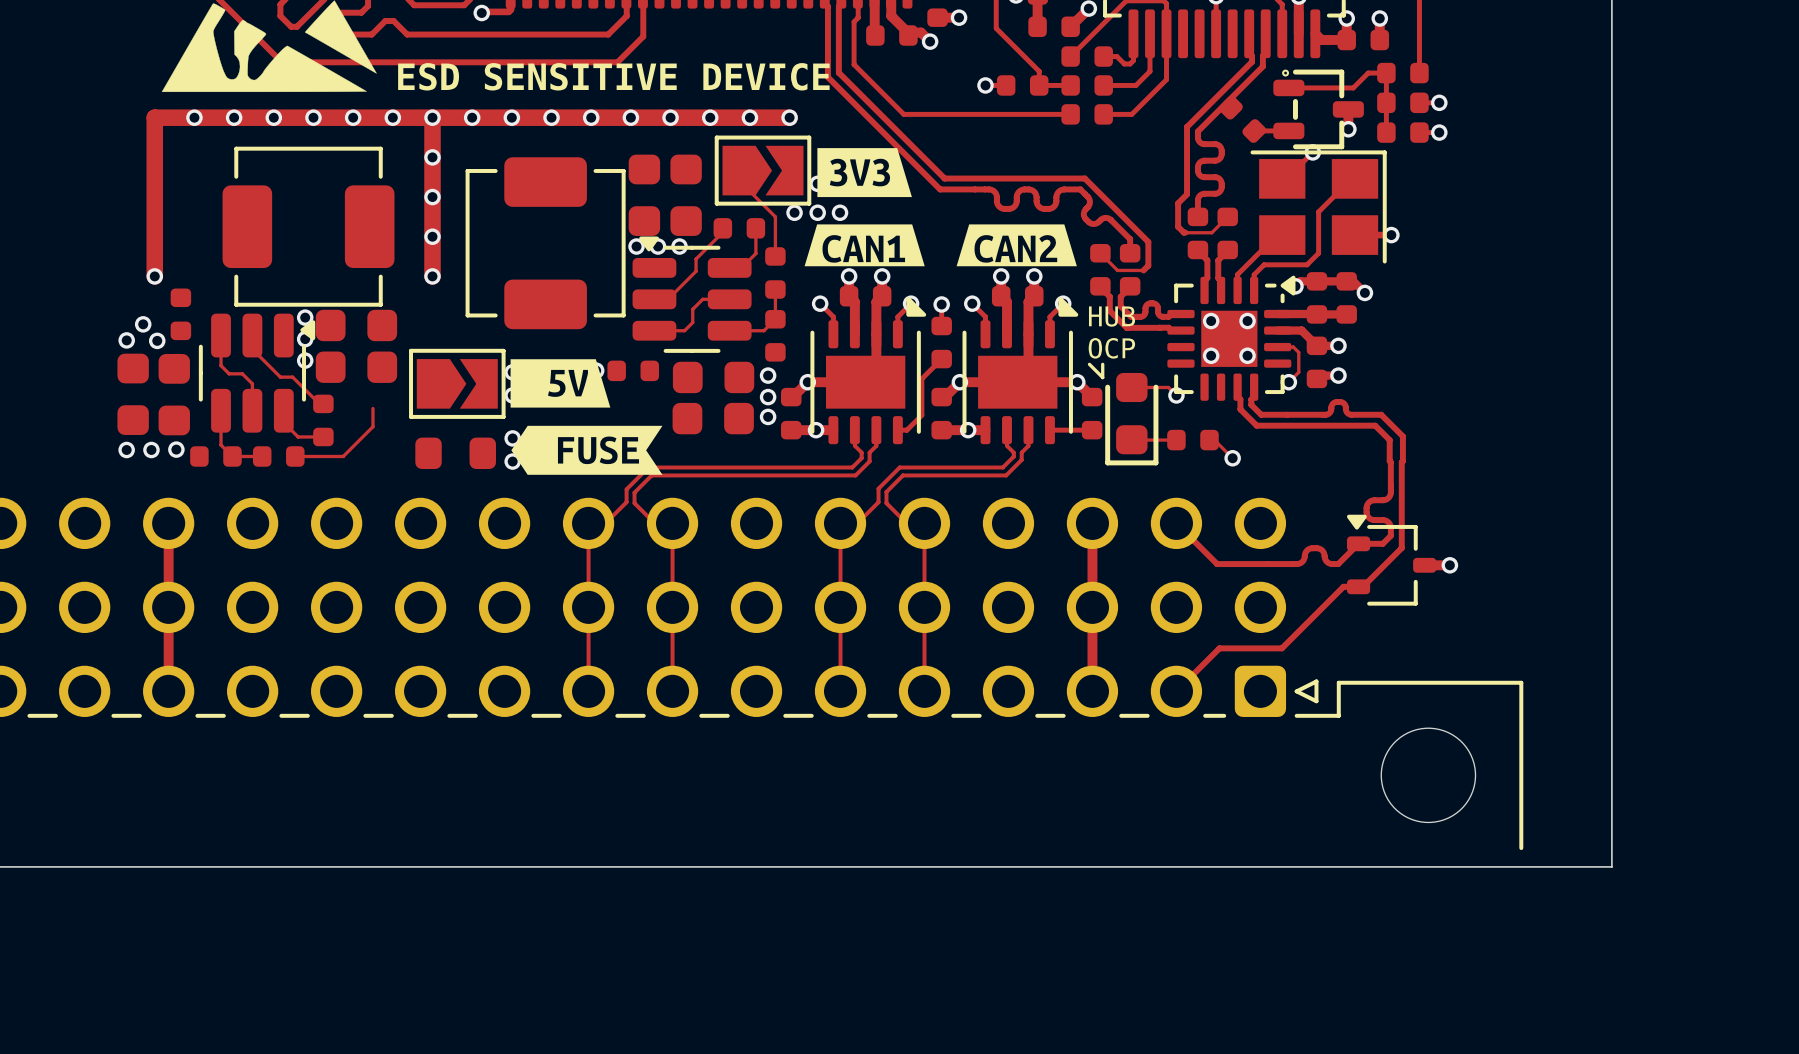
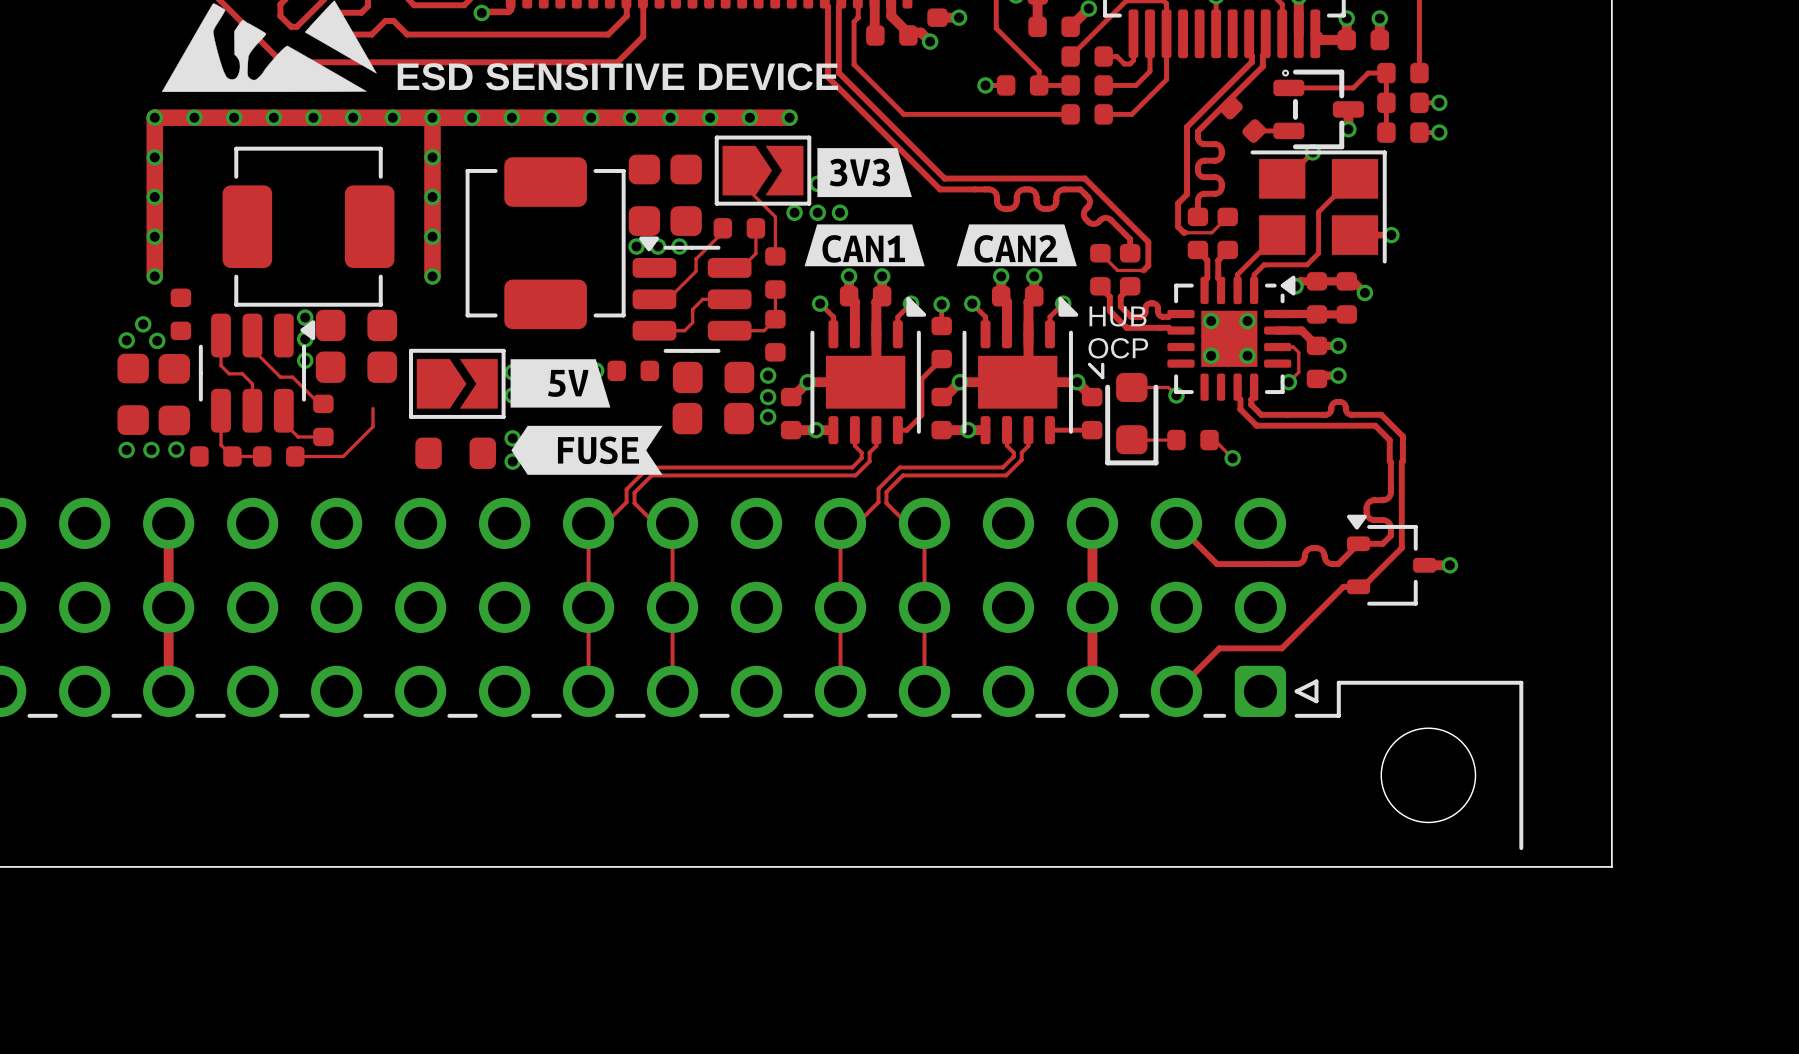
via: none -> (154, 117)
via: none -> (154, 157)
via: none -> (154, 197)
via: none -> (154, 236)

